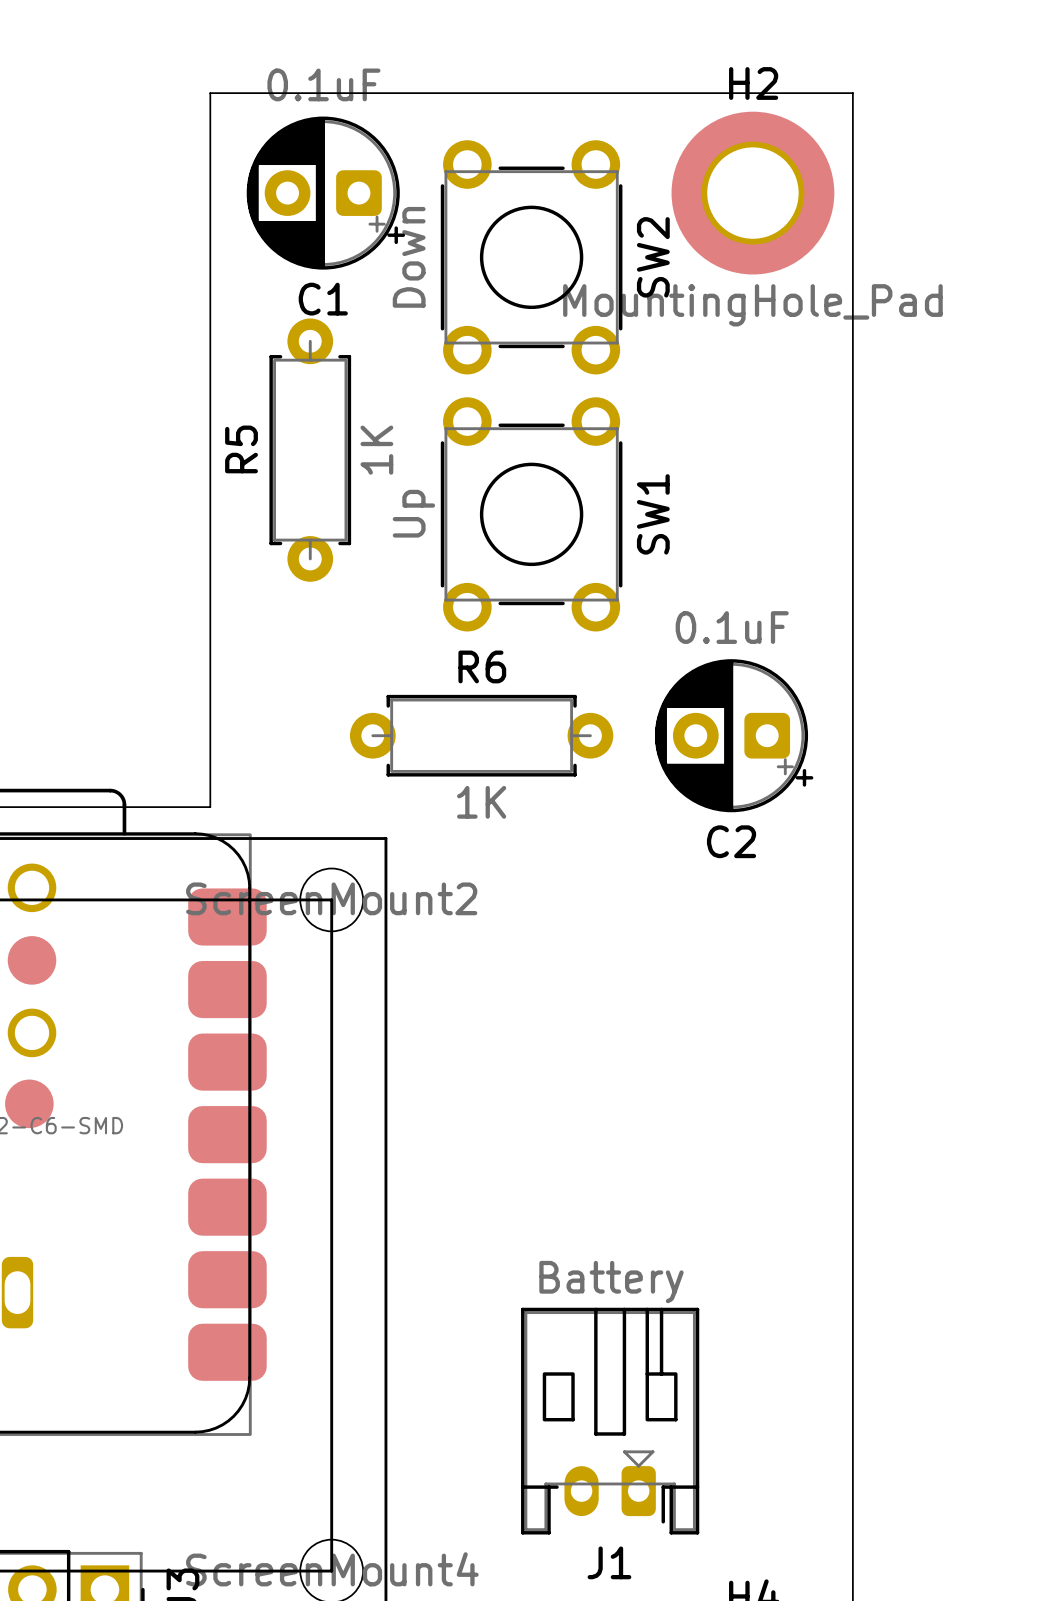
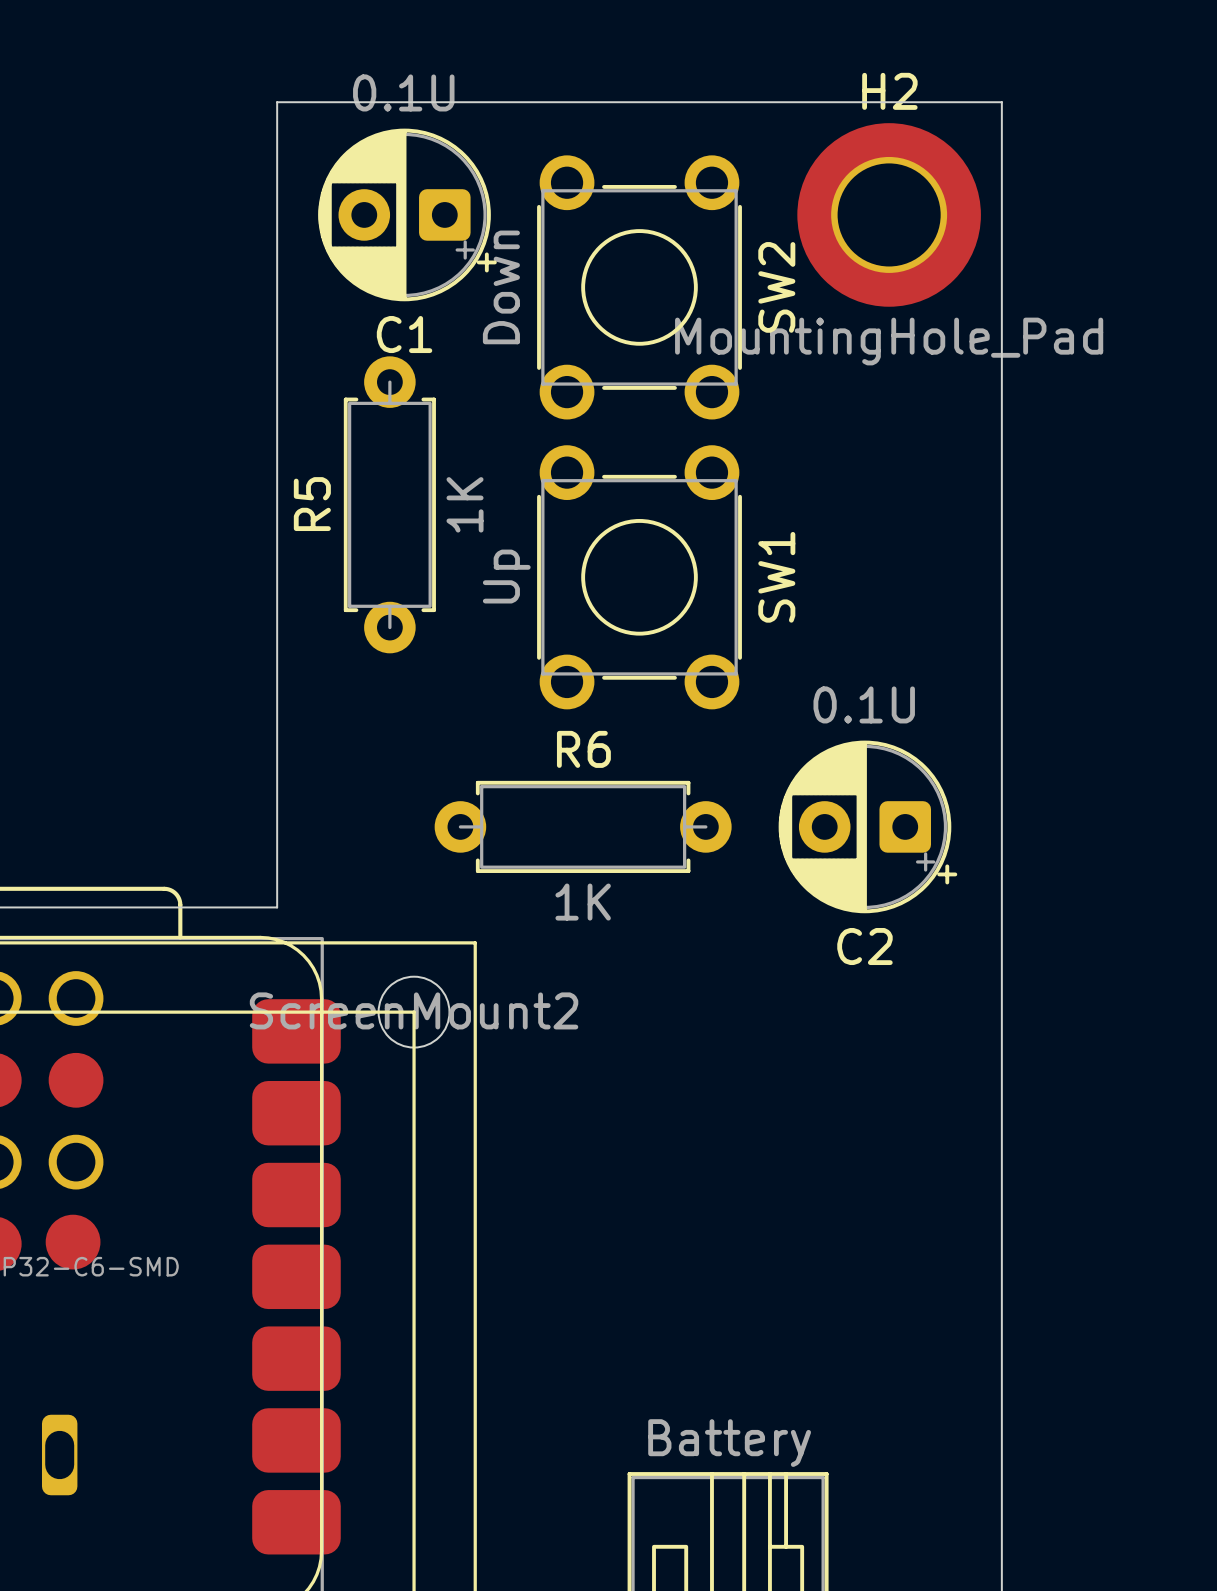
C1 value: 0.1uF (323, 84) -> 0.1U (403, 92)
C2 value: 0.1uF (732, 627) -> 0.1U (864, 704)

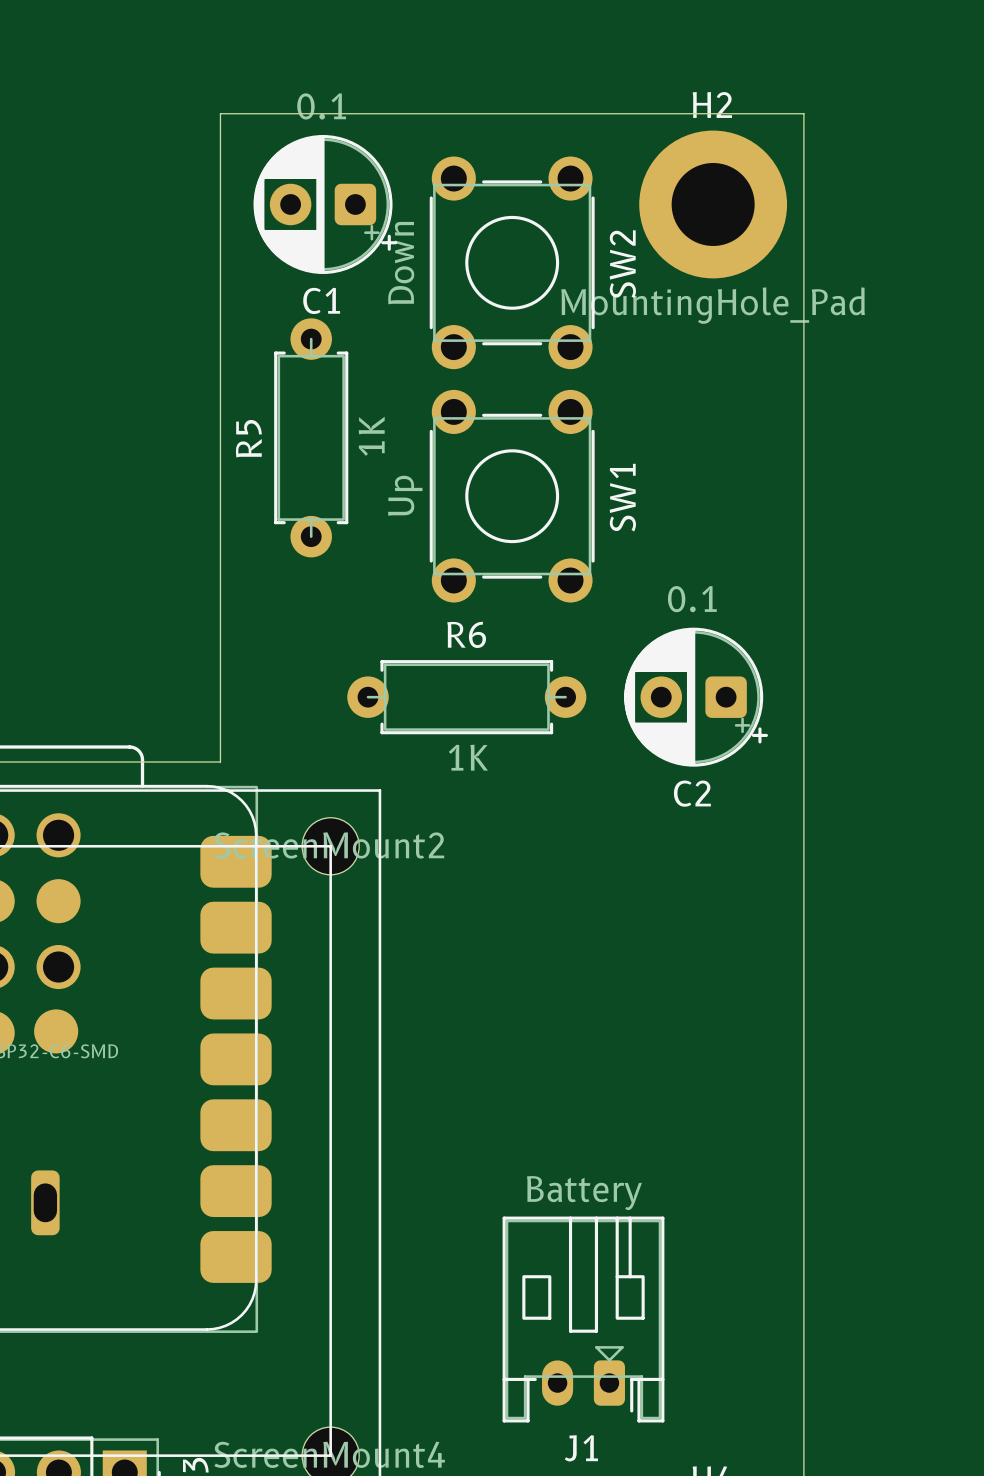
C1 value: 0.1U (403, 92) -> 0.1 (321, 106)
C2 value: 0.1U (864, 704) -> 0.1 (692, 599)

